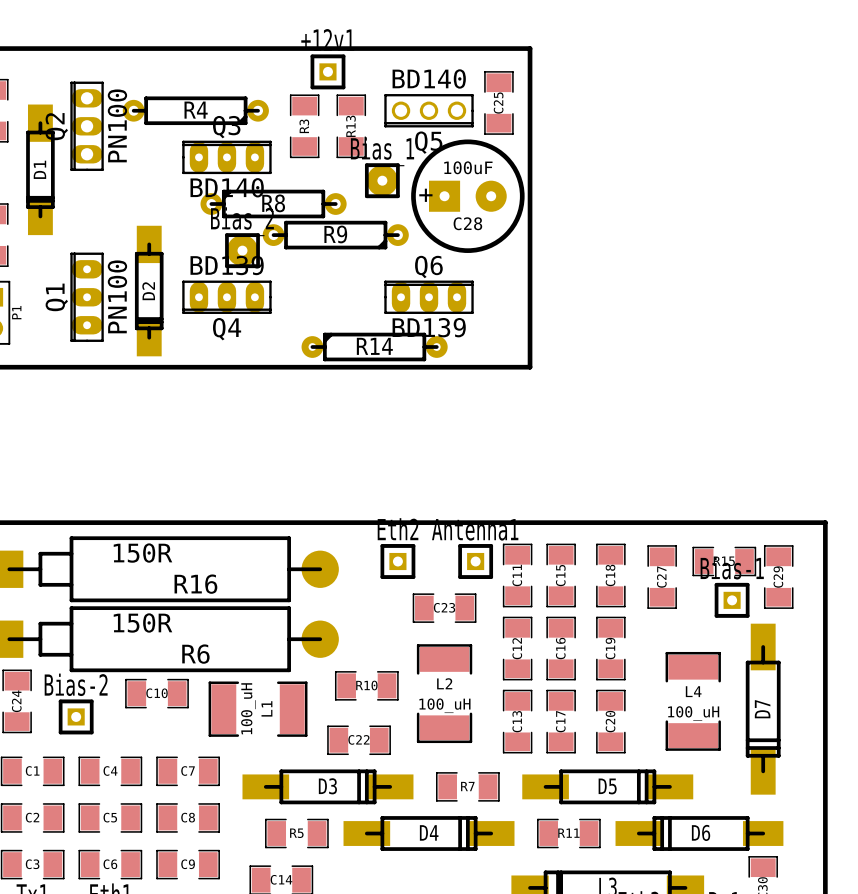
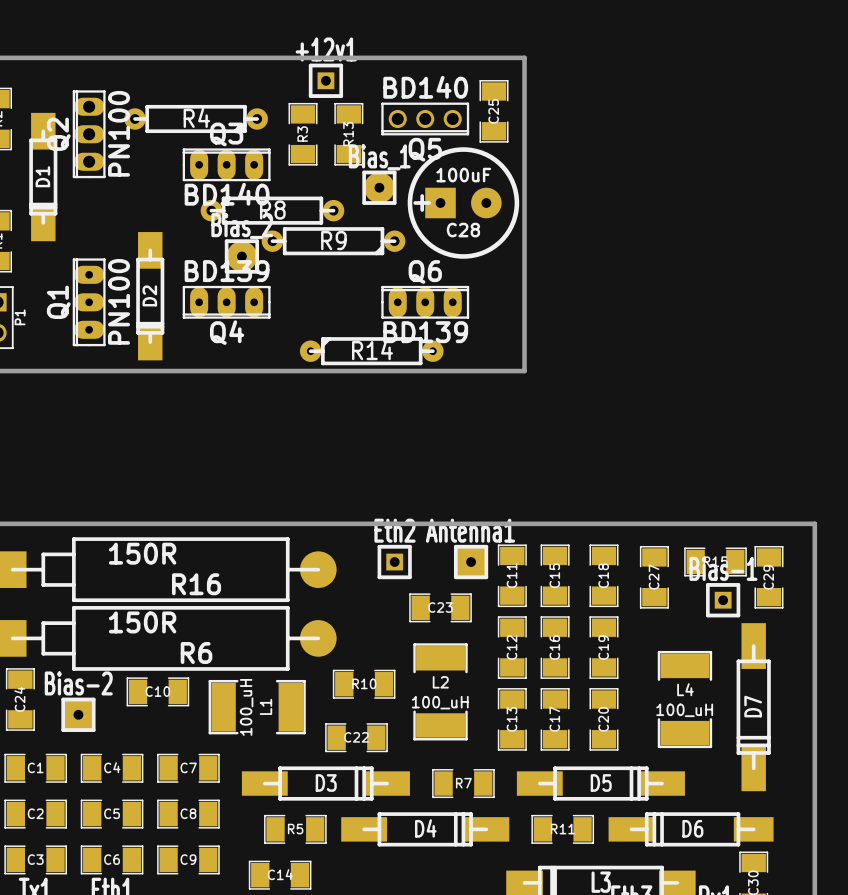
Antenna1 footprint: [458, 544, 494, 579] -> [453, 544, 489, 580]
Bias-2 footprint: [58, 699, 94, 735] -> [61, 697, 96, 732]

